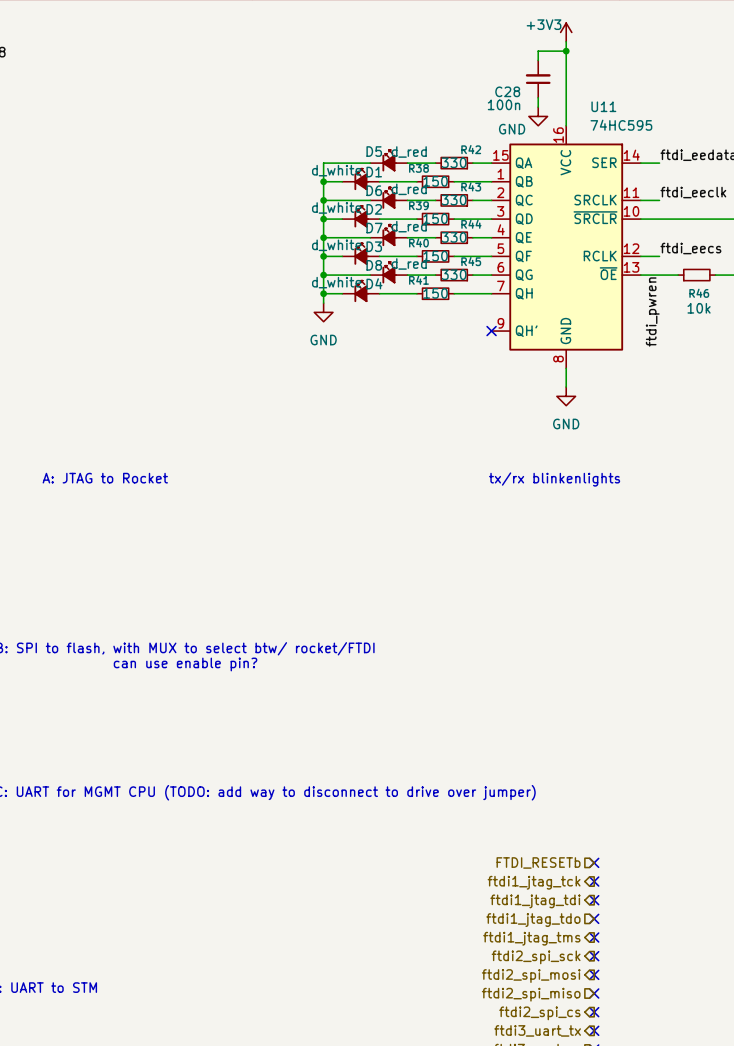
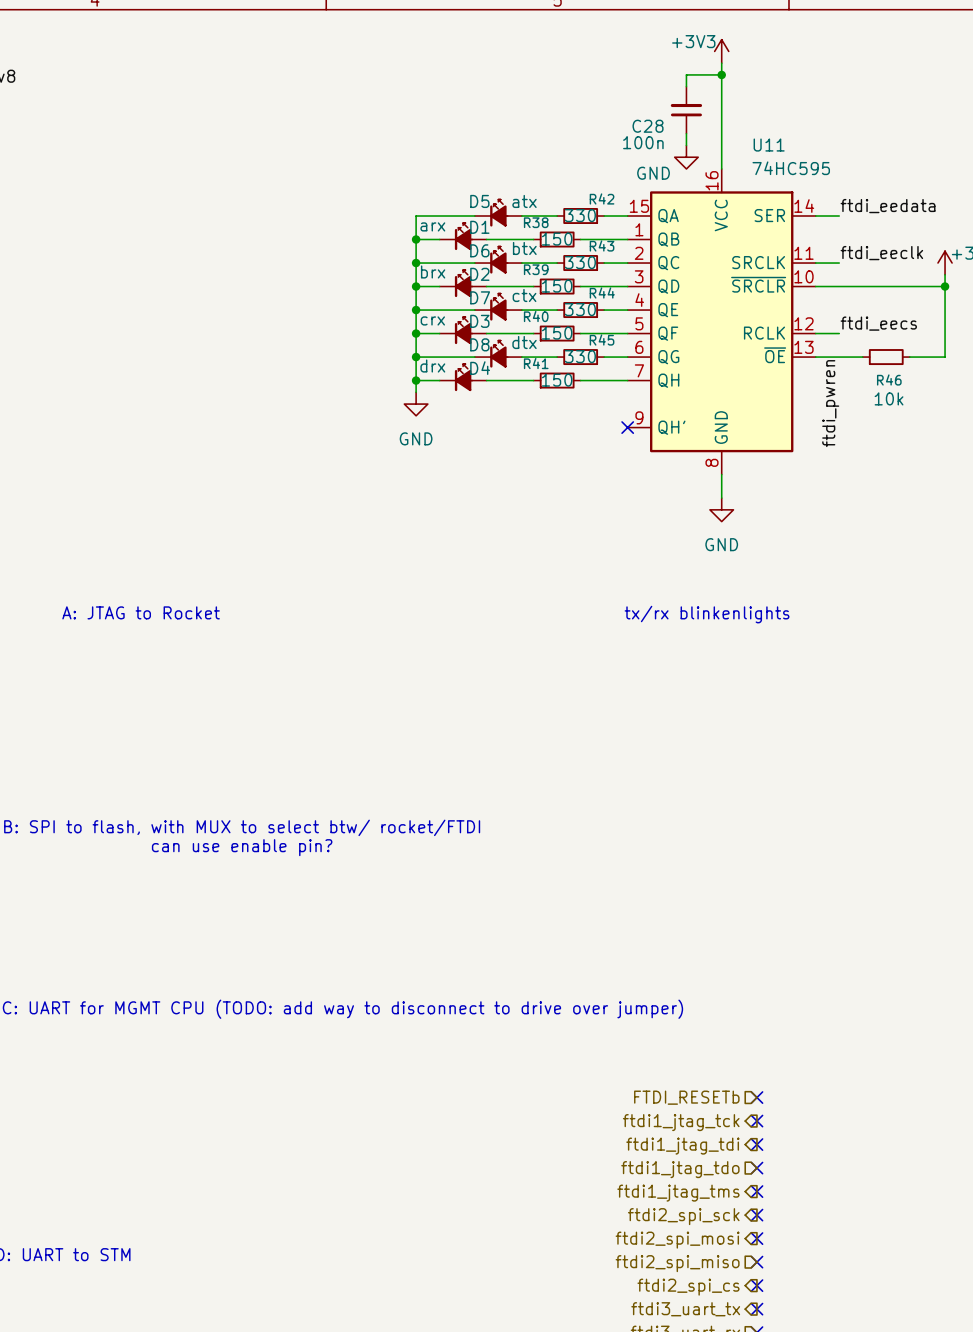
D5 value: d_red (409, 151) -> atx (524, 201)
D1 value: d_white (336, 170) -> arx (432, 226)
D6 value: d_red (409, 189) -> btx (524, 248)
D2 value: d_white (336, 207) -> brx (433, 271)
D7 value: d_red (409, 226) -> ctx (524, 295)
D3 value: d_white (336, 245) -> crx (432, 320)
D8 value: d_red (409, 263) -> dtx (524, 342)
D4 value: d_white (336, 282) -> drx (432, 366)

